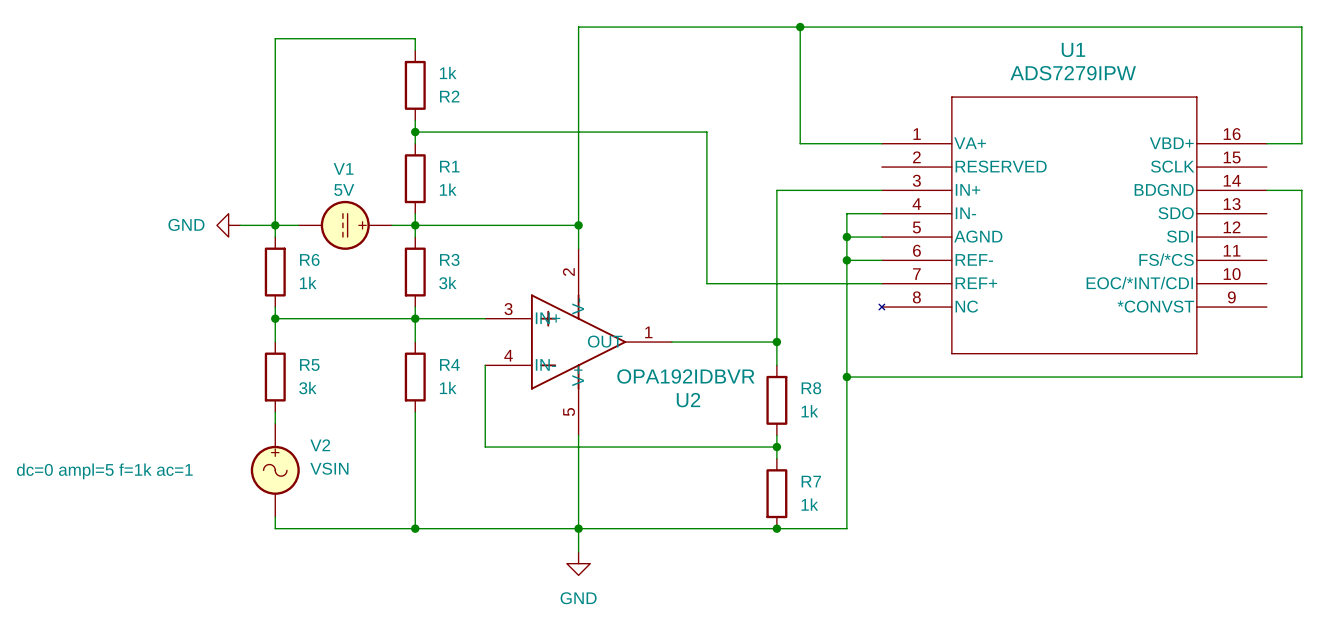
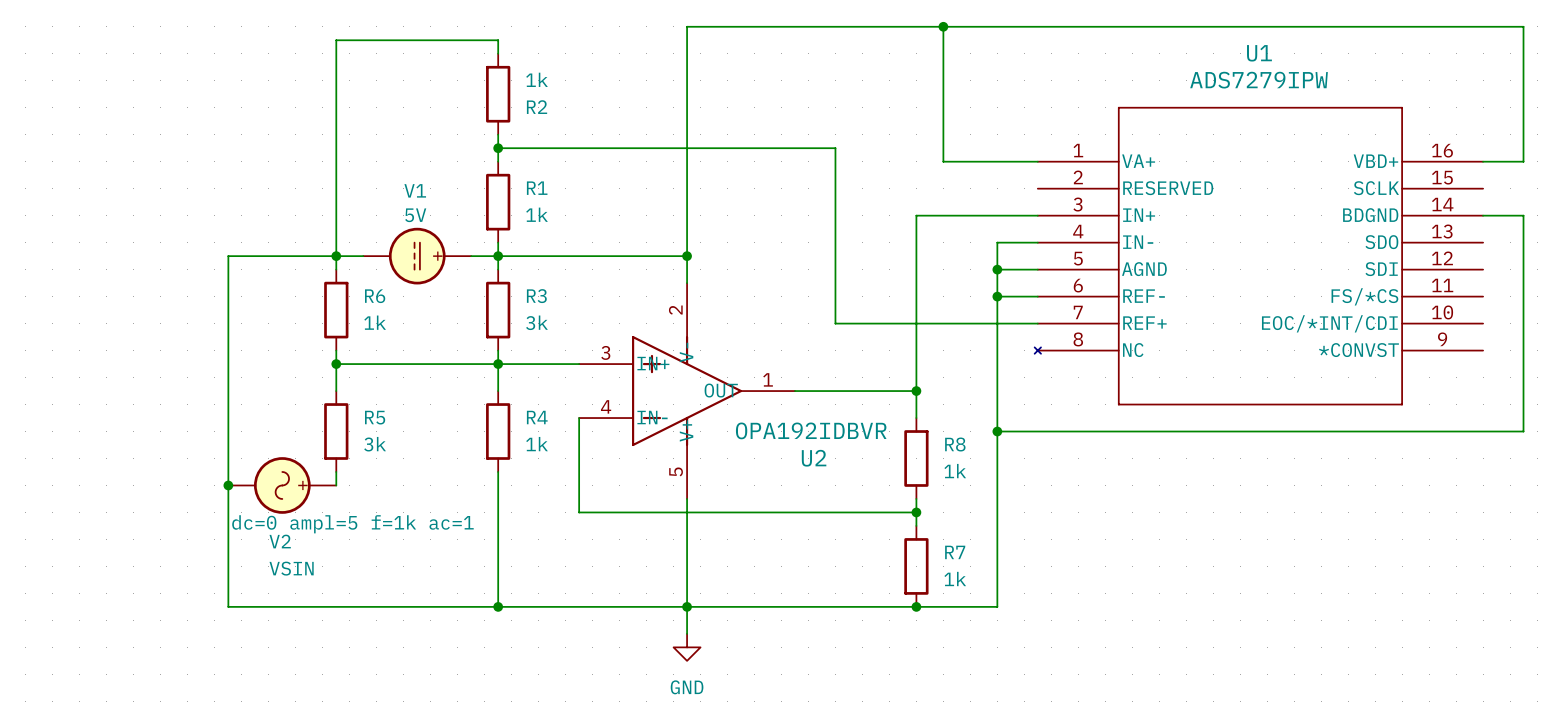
power symbol: GND (228, 225) -> none
junction: none -> (228, 485)
V2 name position: V2 (320, 445) -> V2 (280, 541)
V2 rotation: 0° (275, 470) -> 90° clockwise (282, 485)
V2 position: (275, 470) -> (282, 485)
V2 text position: dc=0 ampl=5 f=1k ac=1 (104, 471) -> dc=0 ampl=5 f=1k ac=1 (352, 524)
wire: (275, 517) (275, 528) -> (295, 256) (228, 256) (228, 606) (336, 606)

